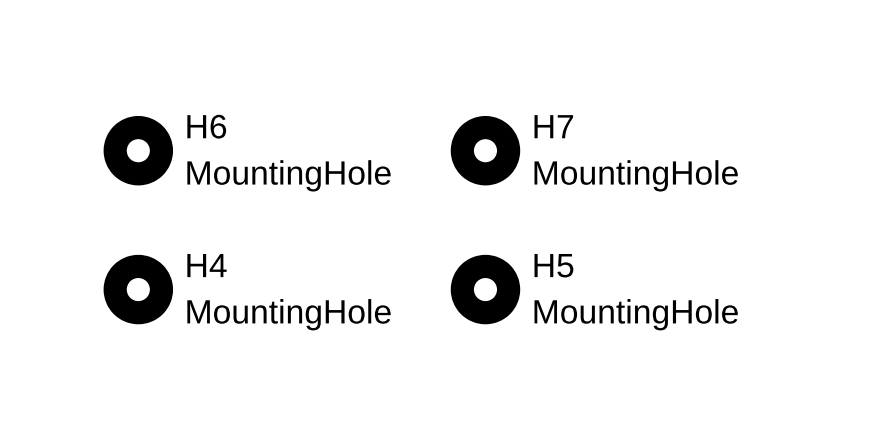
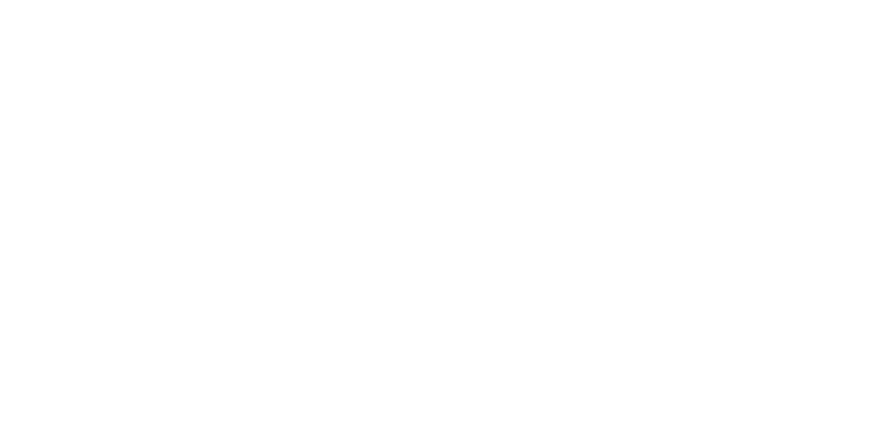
H6: MountingHole (138, 150) -> none
H7: MountingHole (485, 150) -> none
H4: MountingHole (138, 289) -> none
H5: MountingHole (485, 289) -> none

